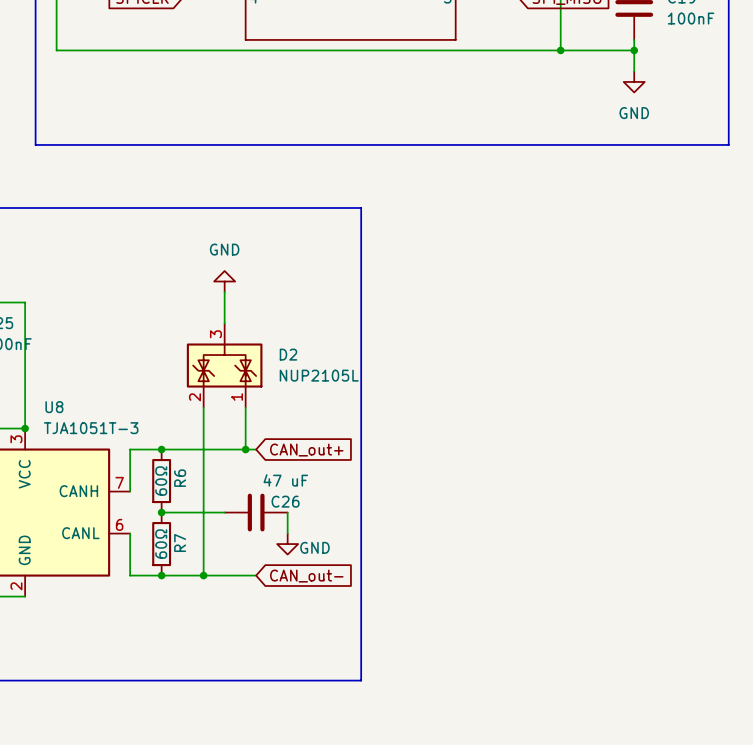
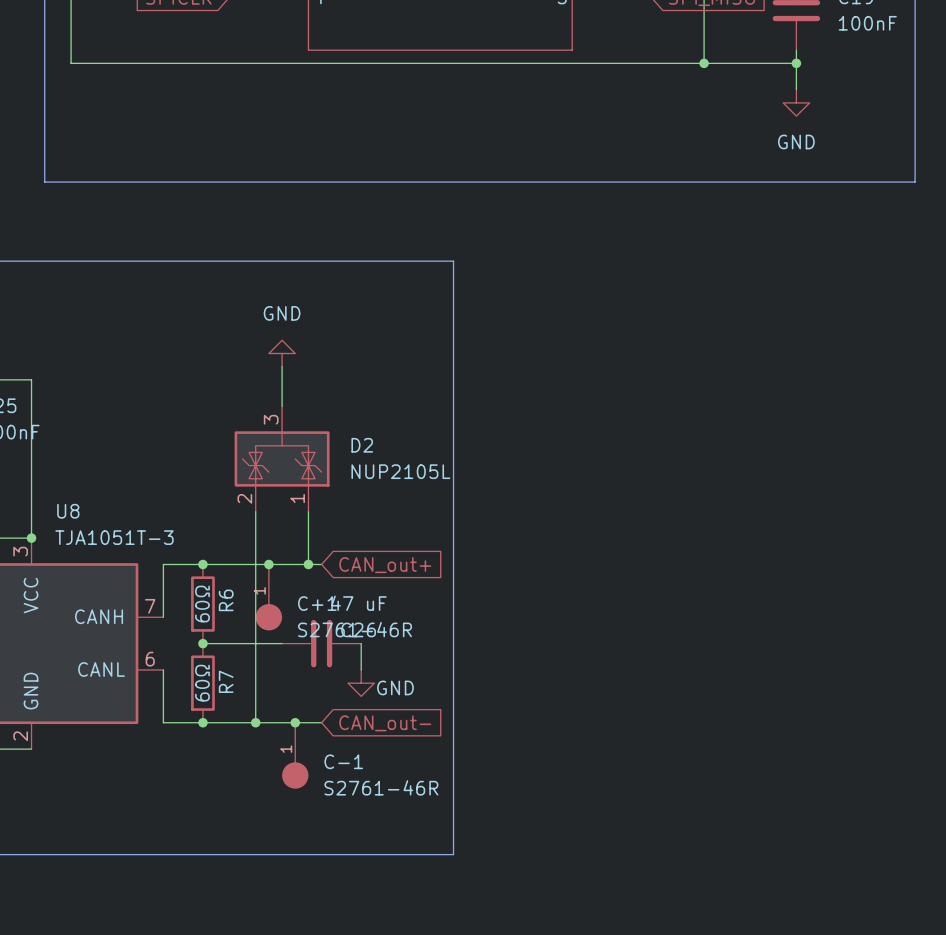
junction: none -> (268, 564)
C+1: none -> S2761-46R (268, 597)
junction: none -> (295, 722)
C-1: none -> S2761-46R (295, 755)

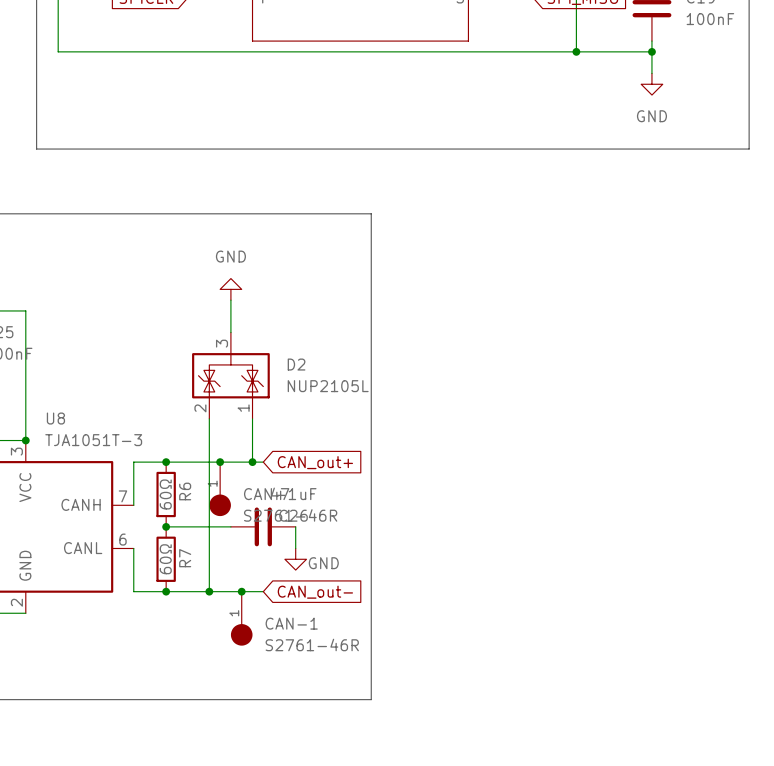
C+1 name: C+1 (317, 603) -> CAN+1 (270, 494)
C-1 name: C-1 (343, 761) -> CAN-1 (291, 623)

